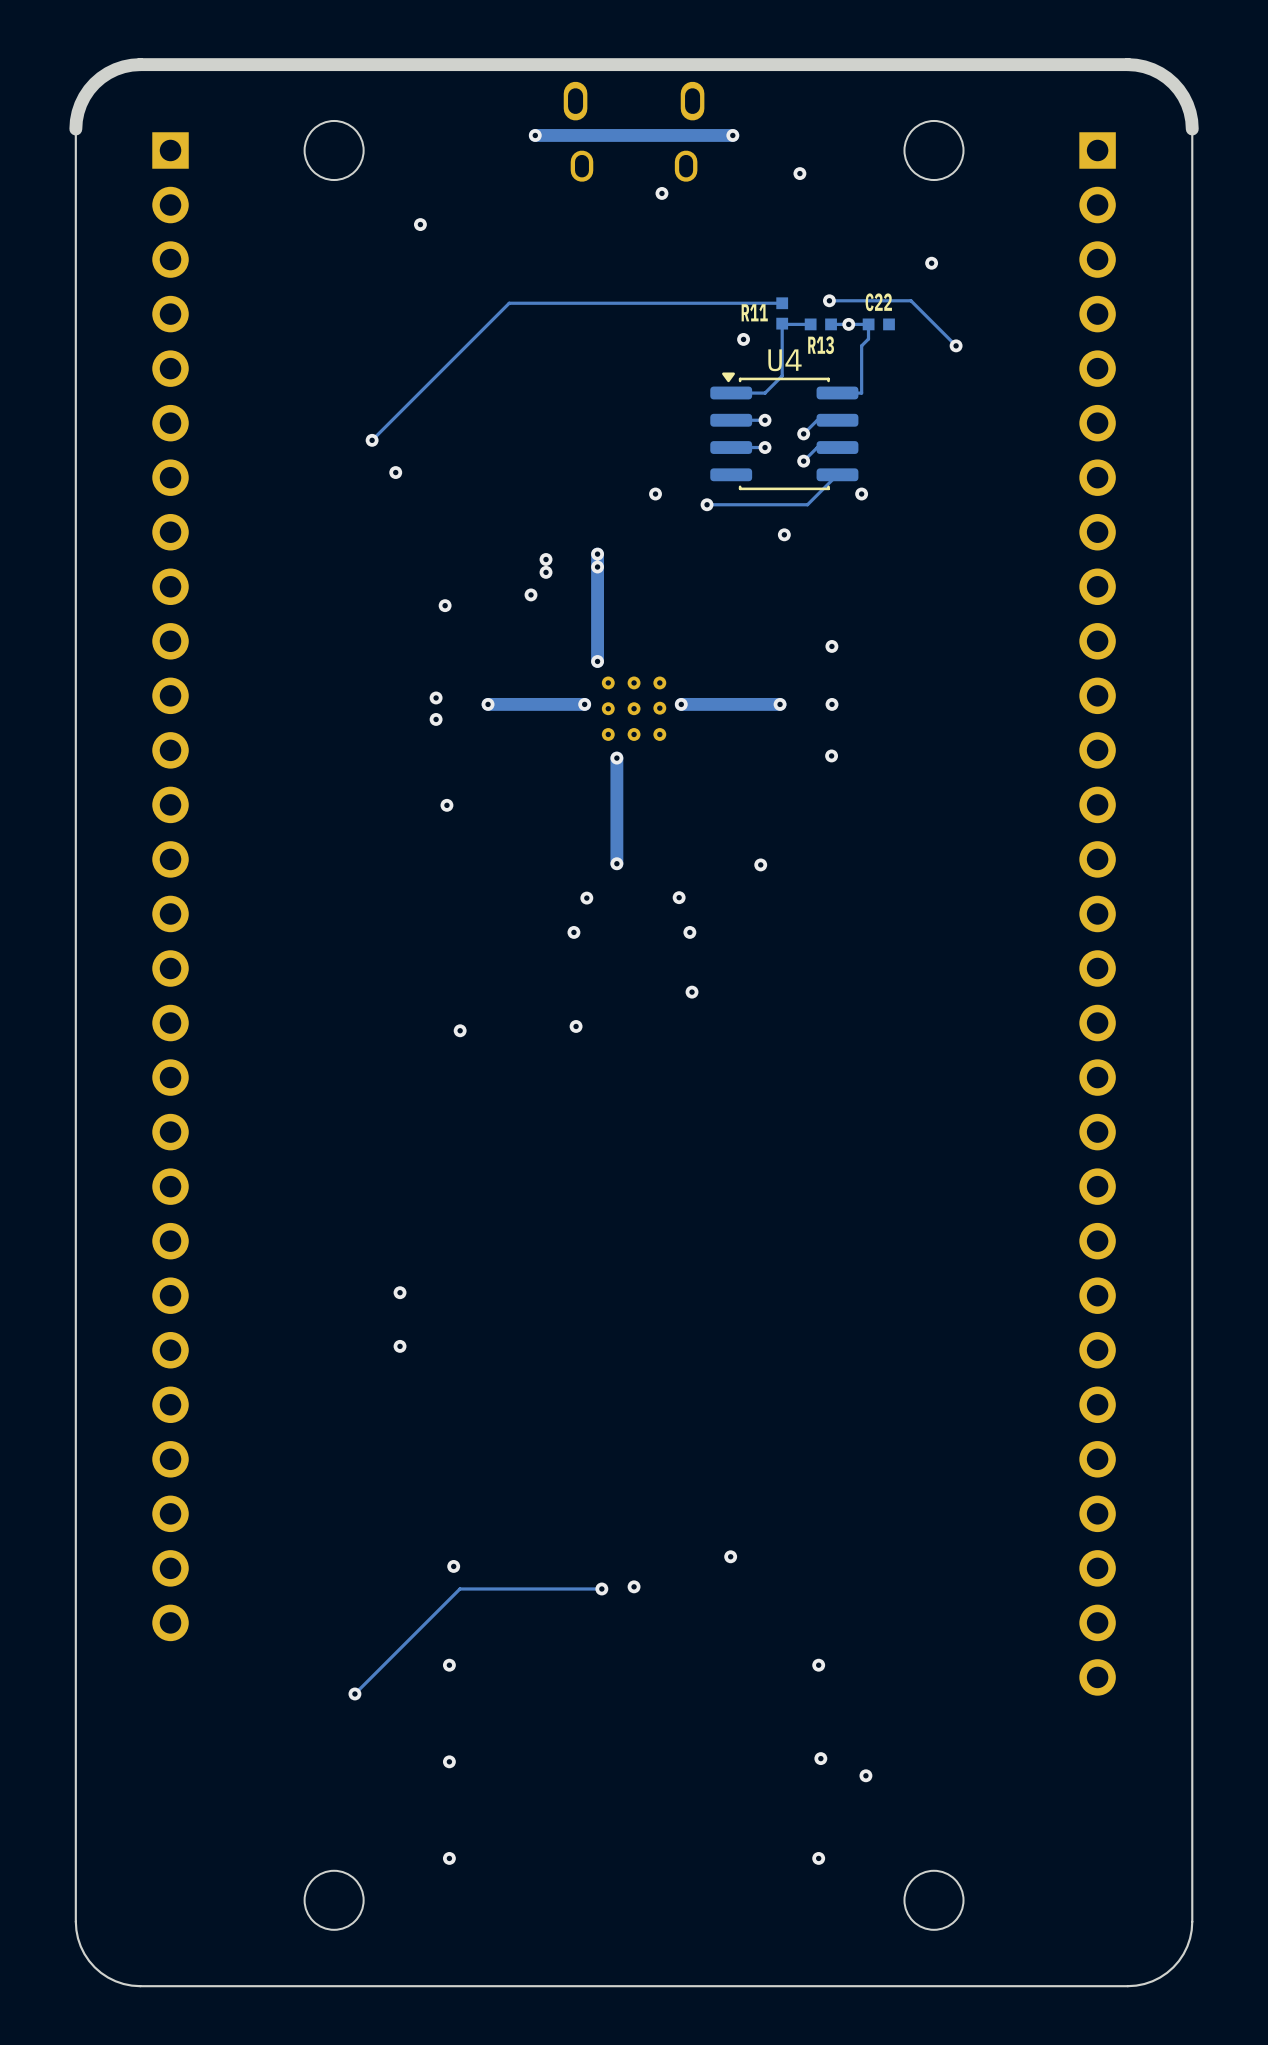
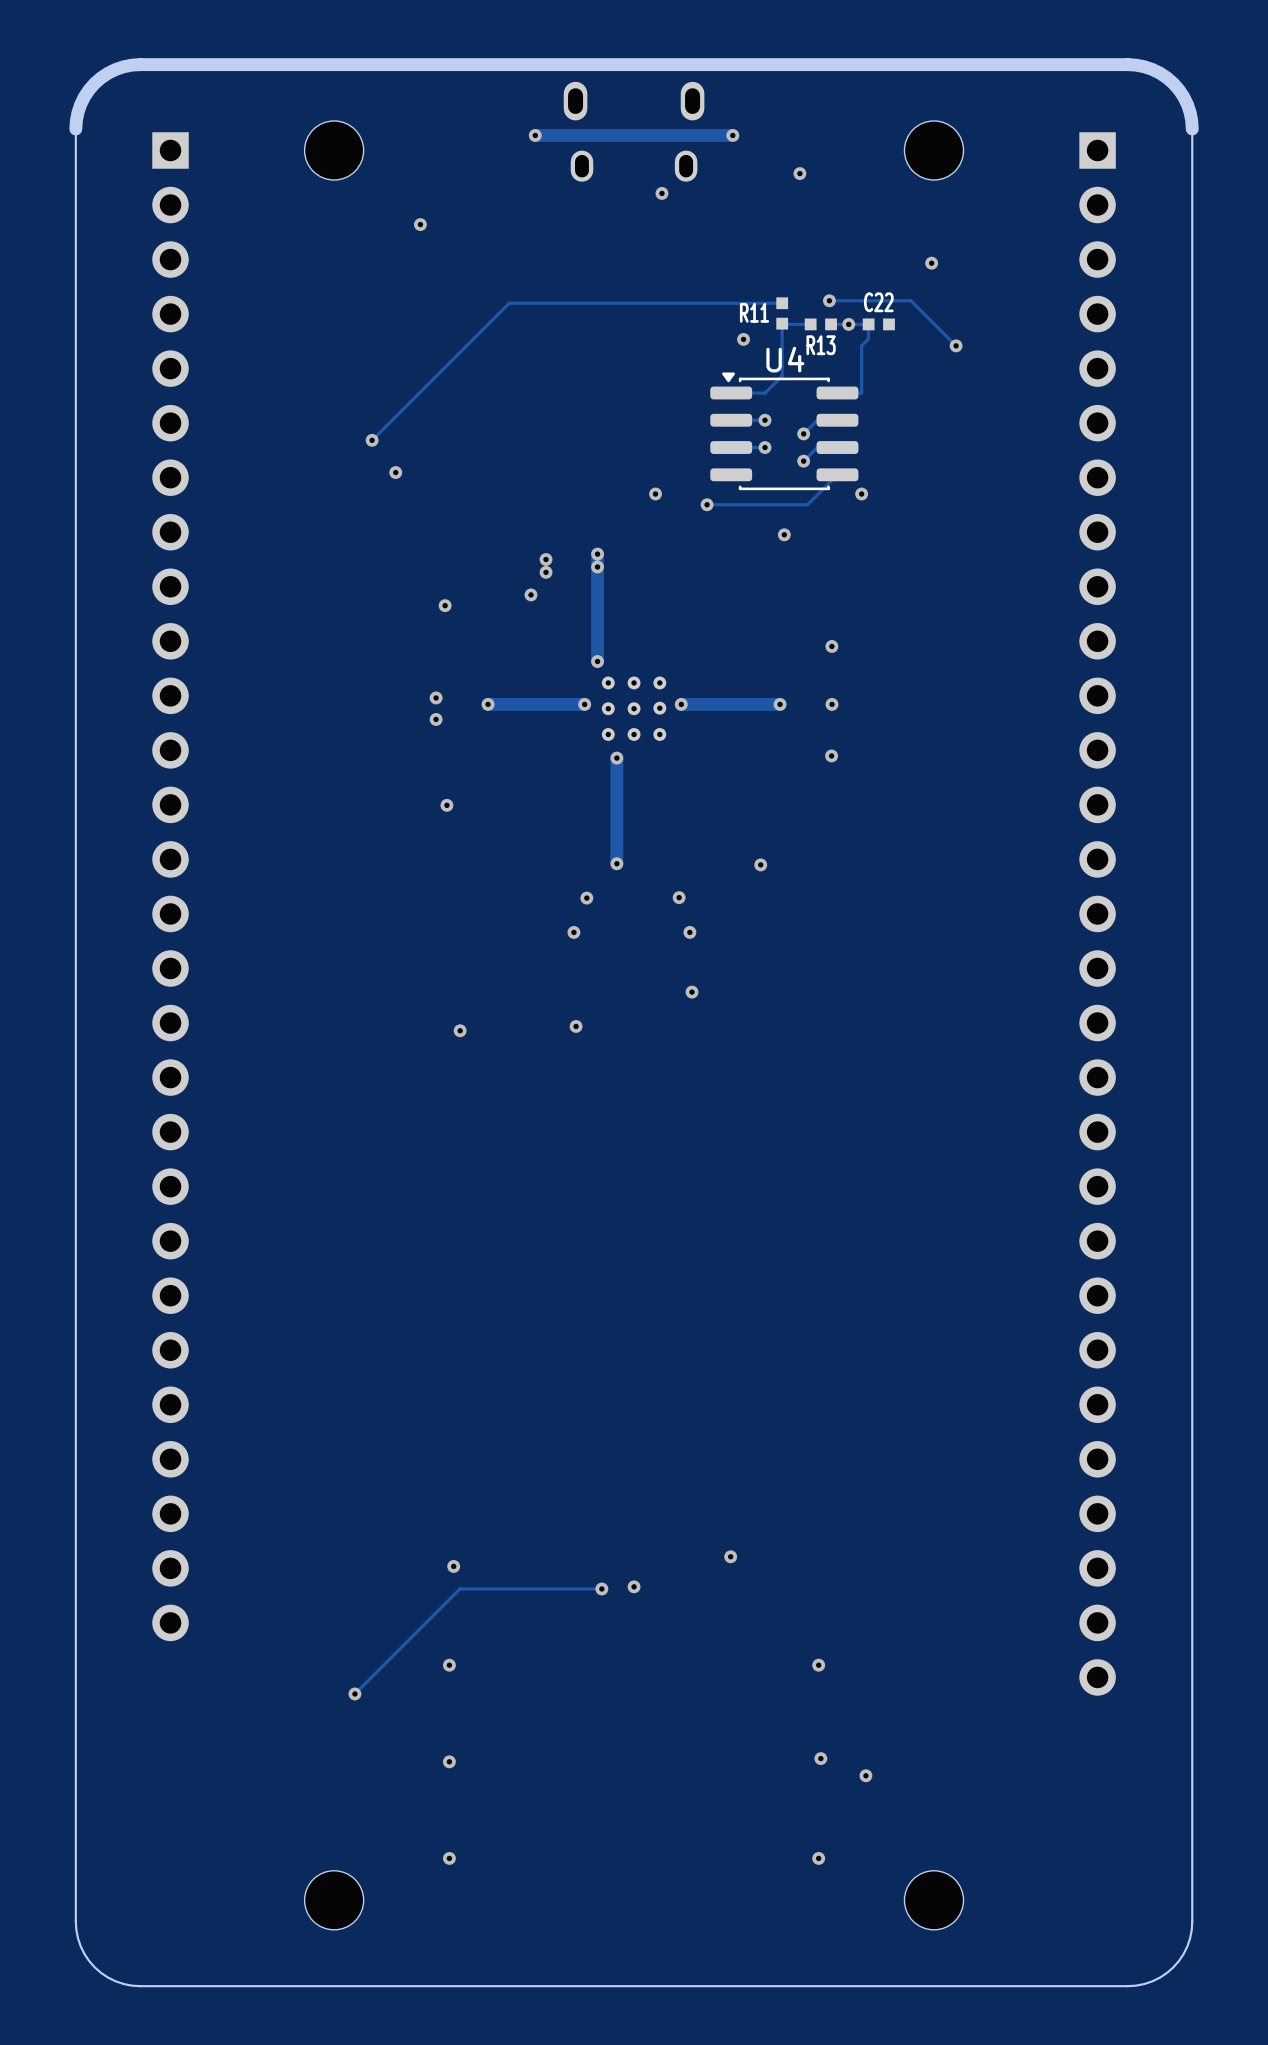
via: (400, 1292) -> none
via: (400, 1346) -> none

